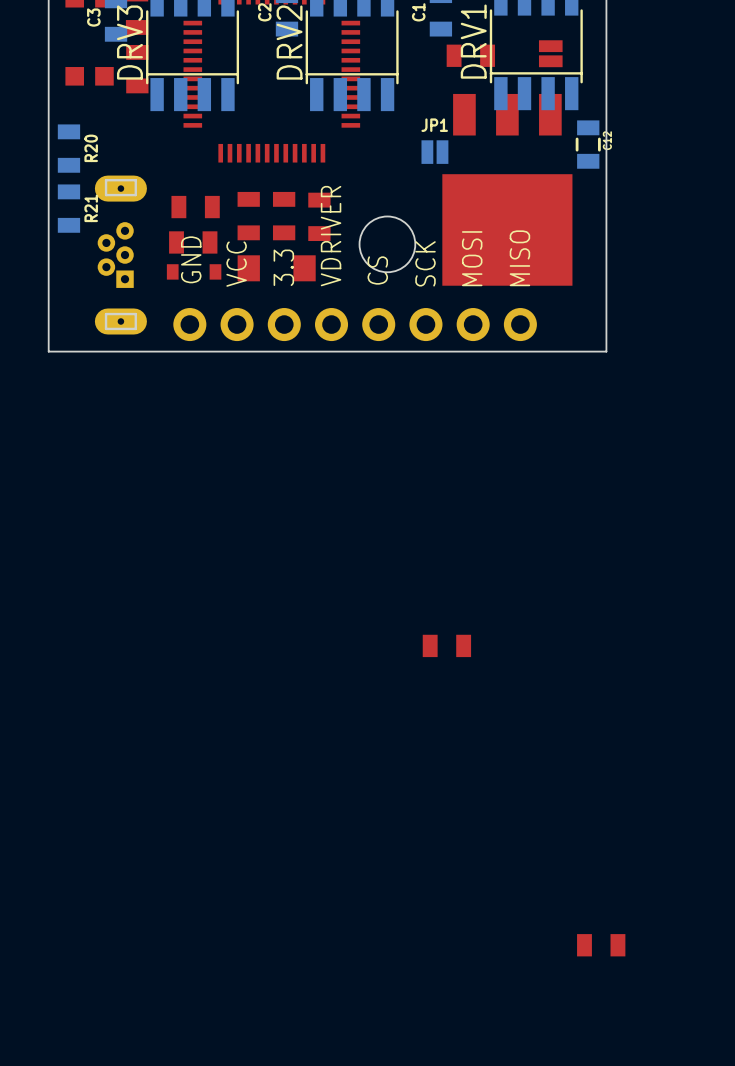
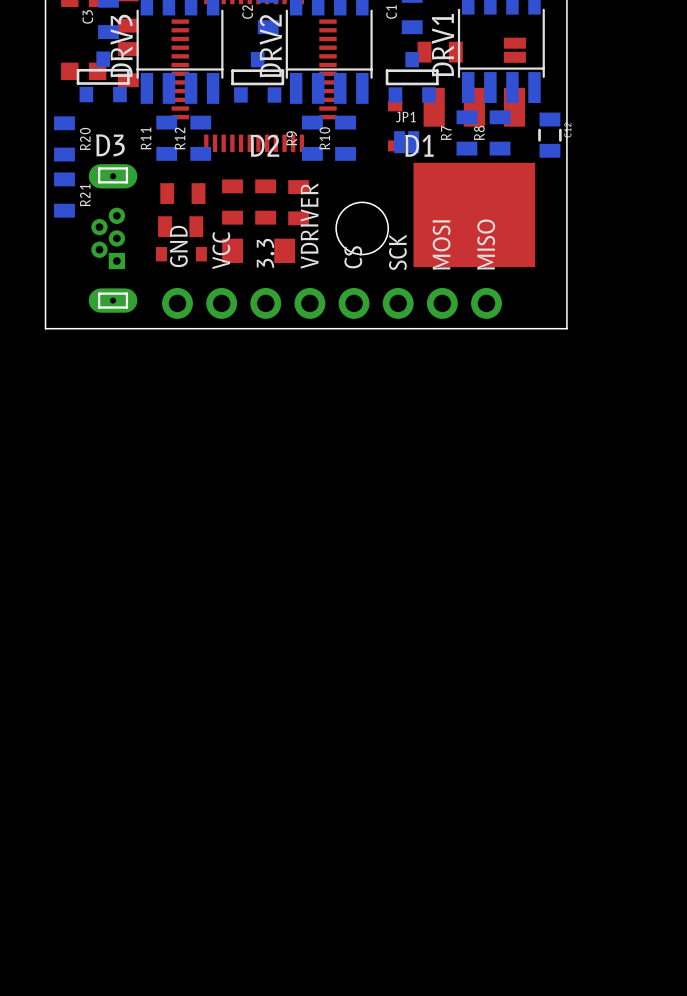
D3: none -> (103, 76)
D2: none -> (257, 77)
D1: none -> (412, 77)
part: none -> (395, 125)
R7: none -> (466, 132)
R8: none -> (500, 132)
R11: none -> (166, 138)
R12: none -> (200, 138)
R9: none -> (312, 138)
R10: none -> (345, 138)
part: (446, 645) -> none
part: (601, 945) -> none

